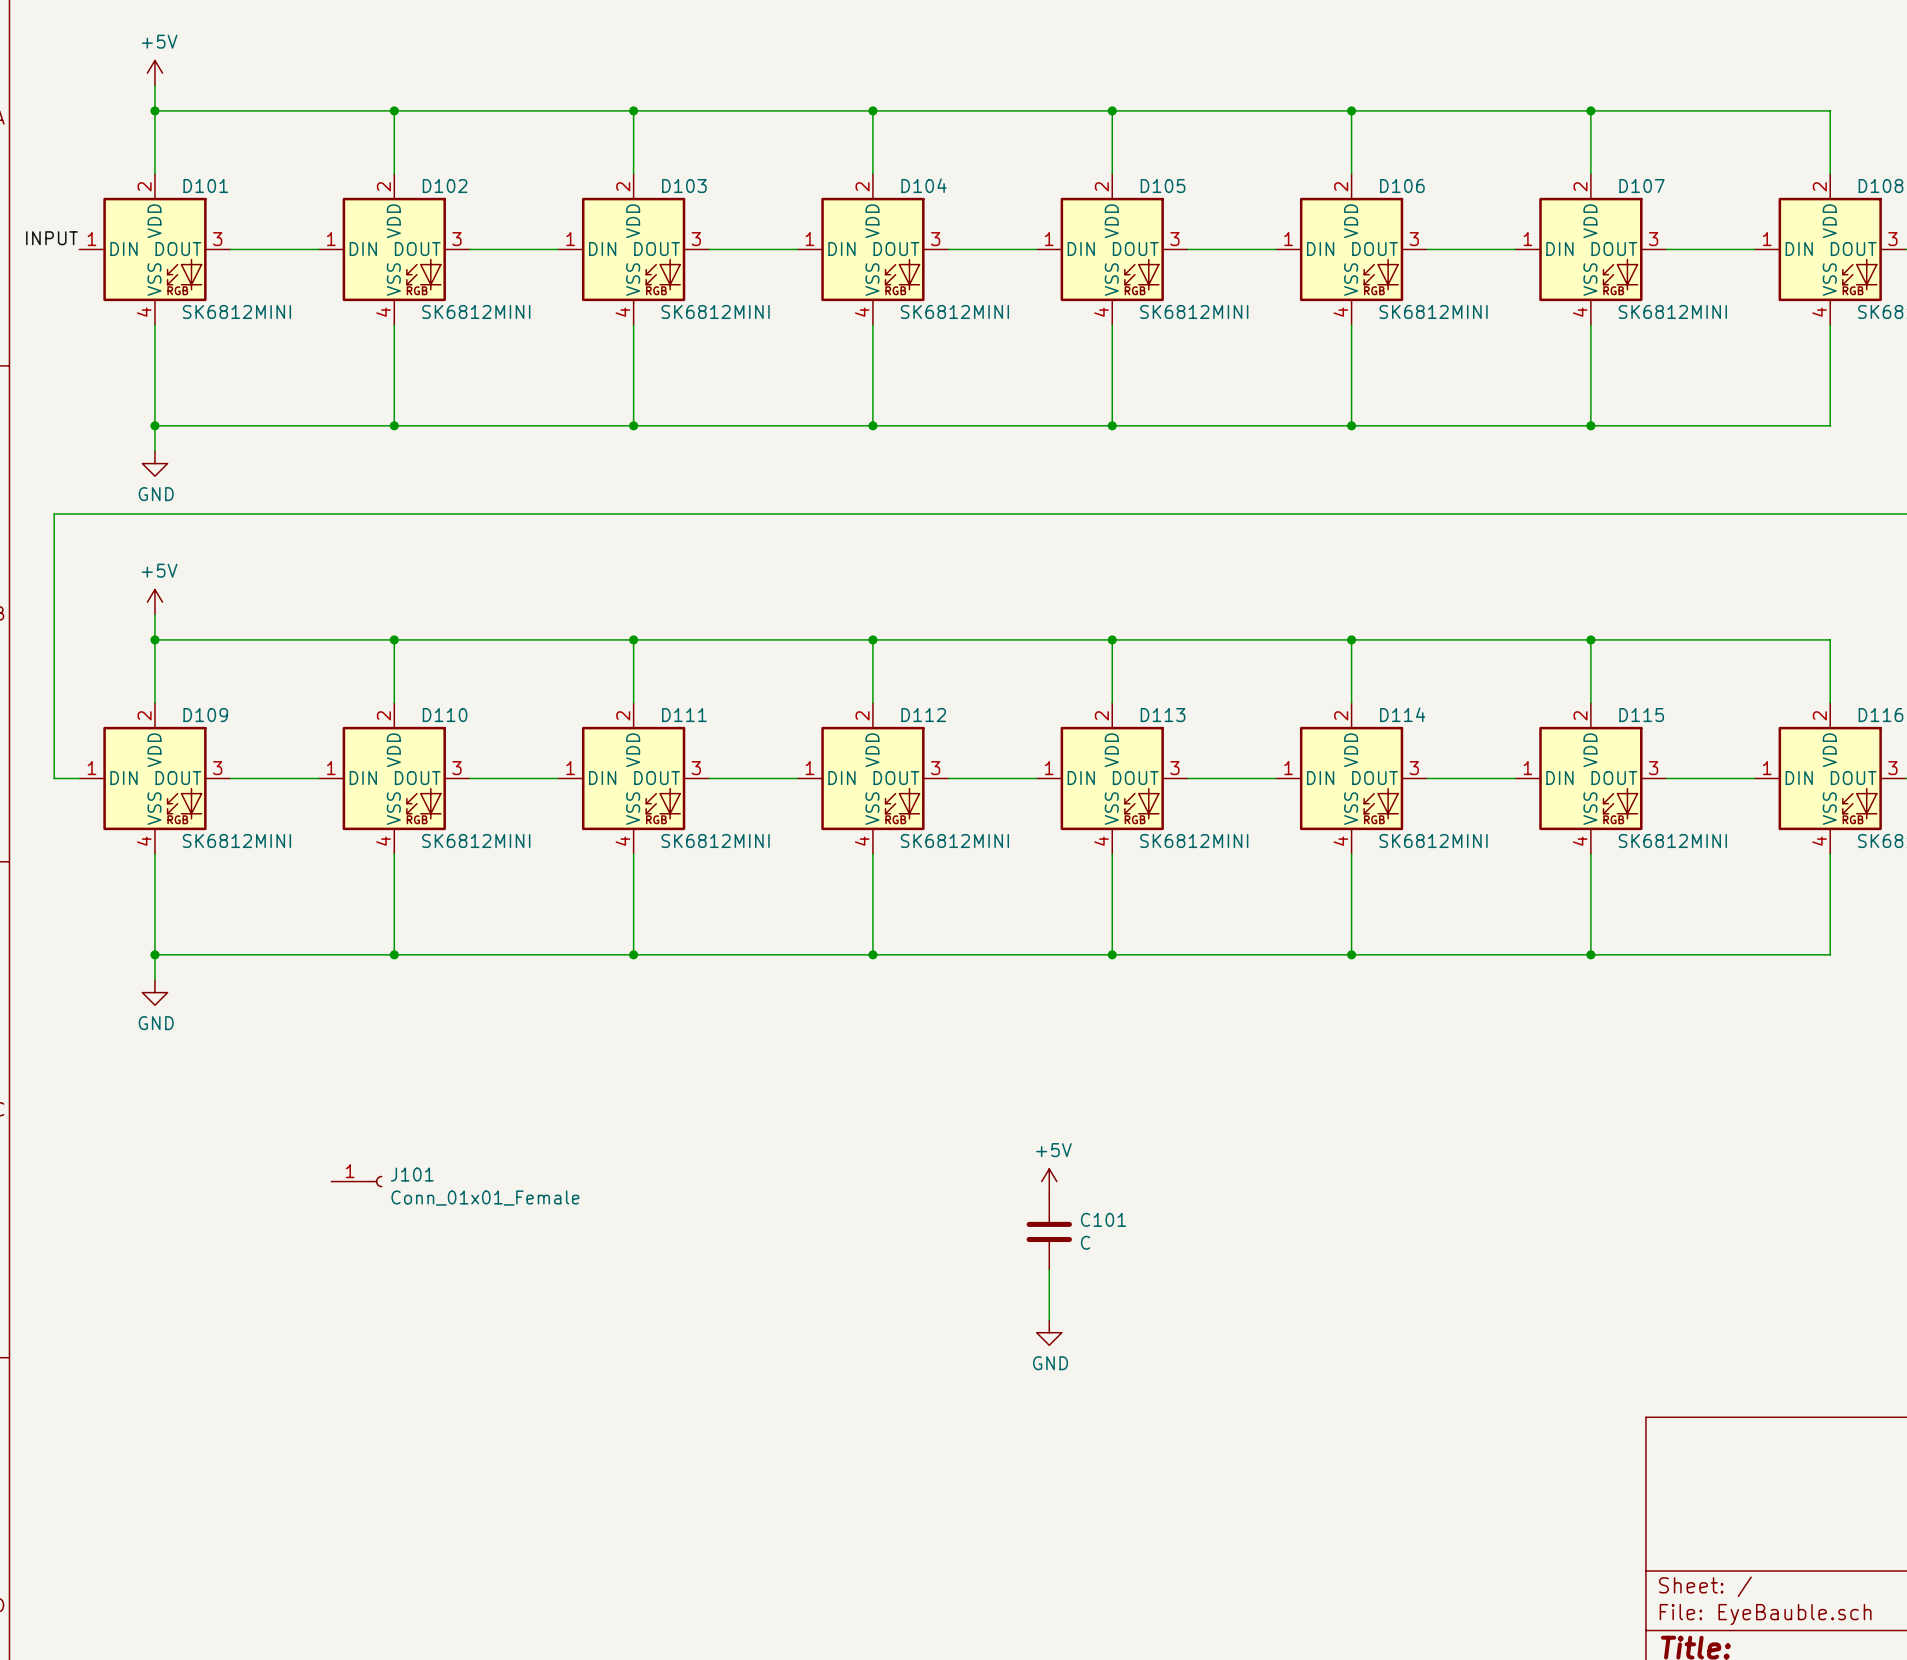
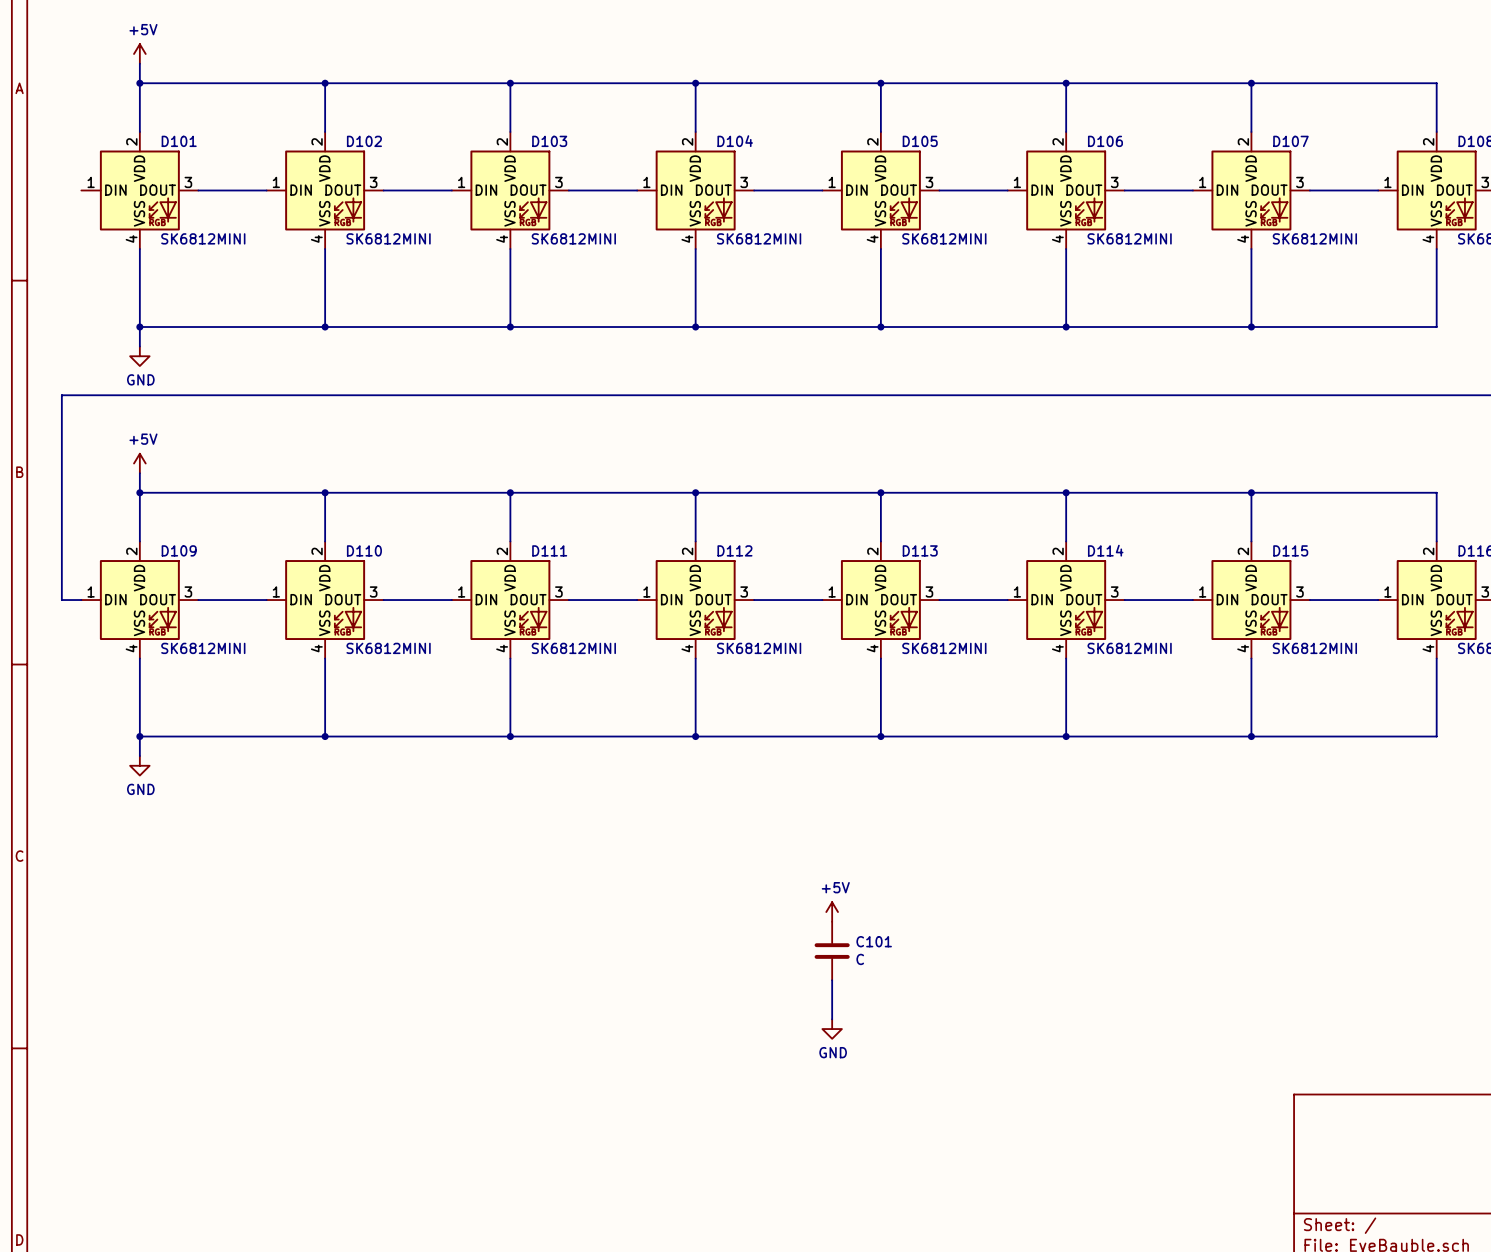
label: INPUT (52, 238) -> none
J101: Conn_01x01_Female (356, 1181) -> none

